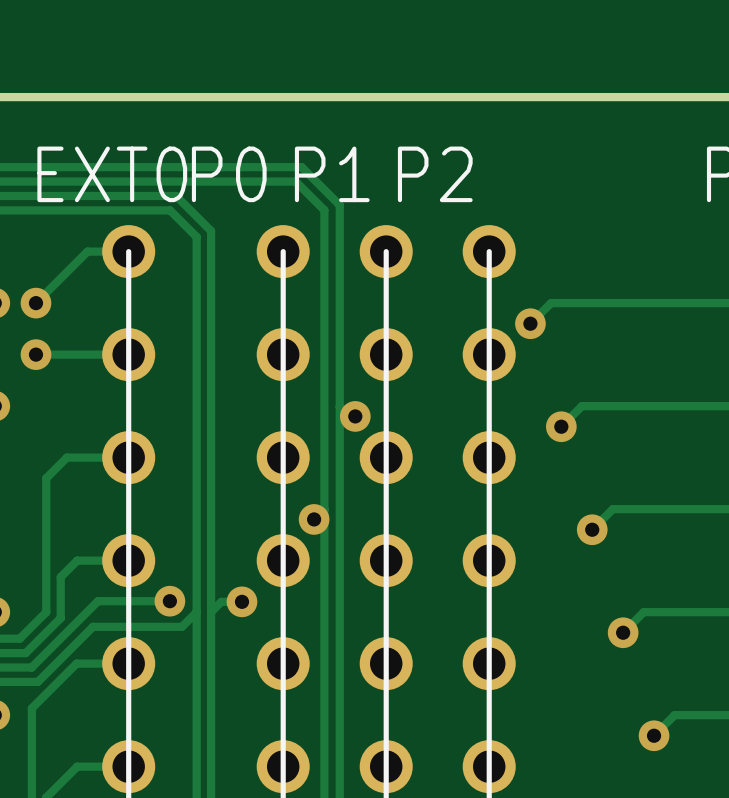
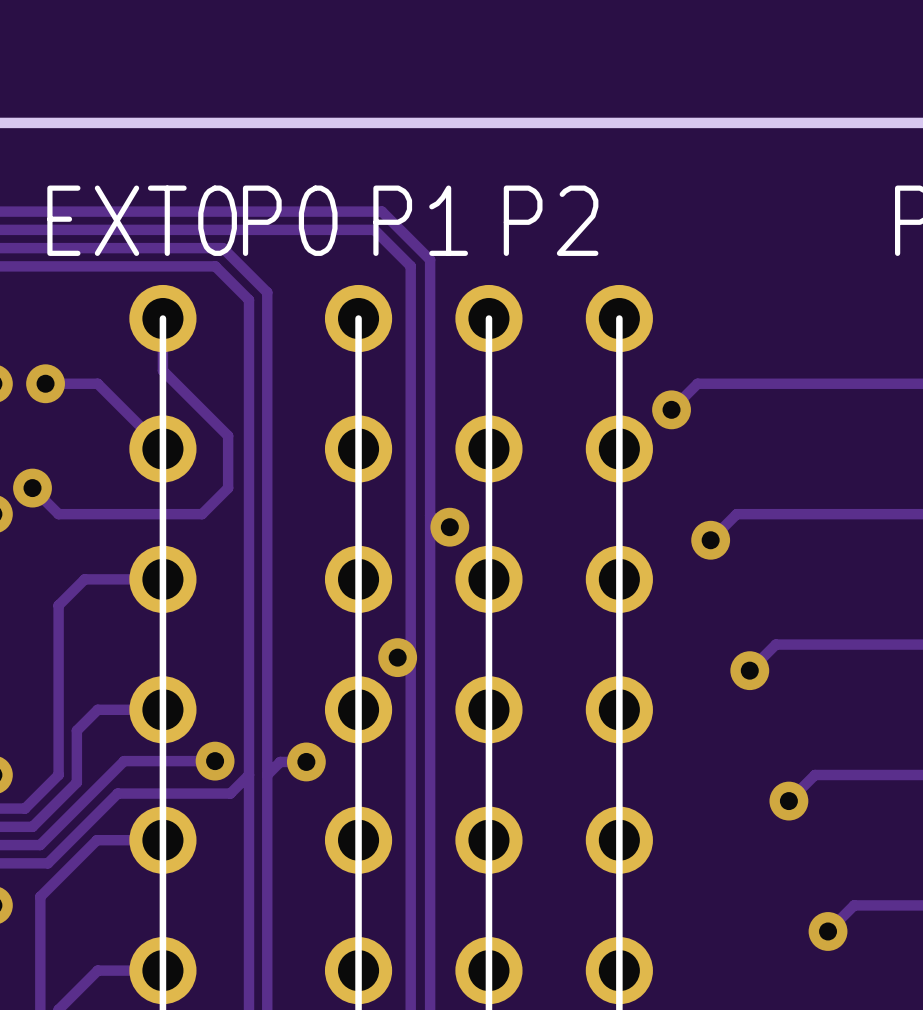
track: (128, 251) (87, 251) (35, 303) -> (162, 318) (162, 370) (228, 435) (228, 488) (202, 514) (58, 514) (32, 488)
track: (35, 354) (128, 354) -> (45, 383) (97, 383) (162, 448)
via position: (35, 354) -> (32, 488)

